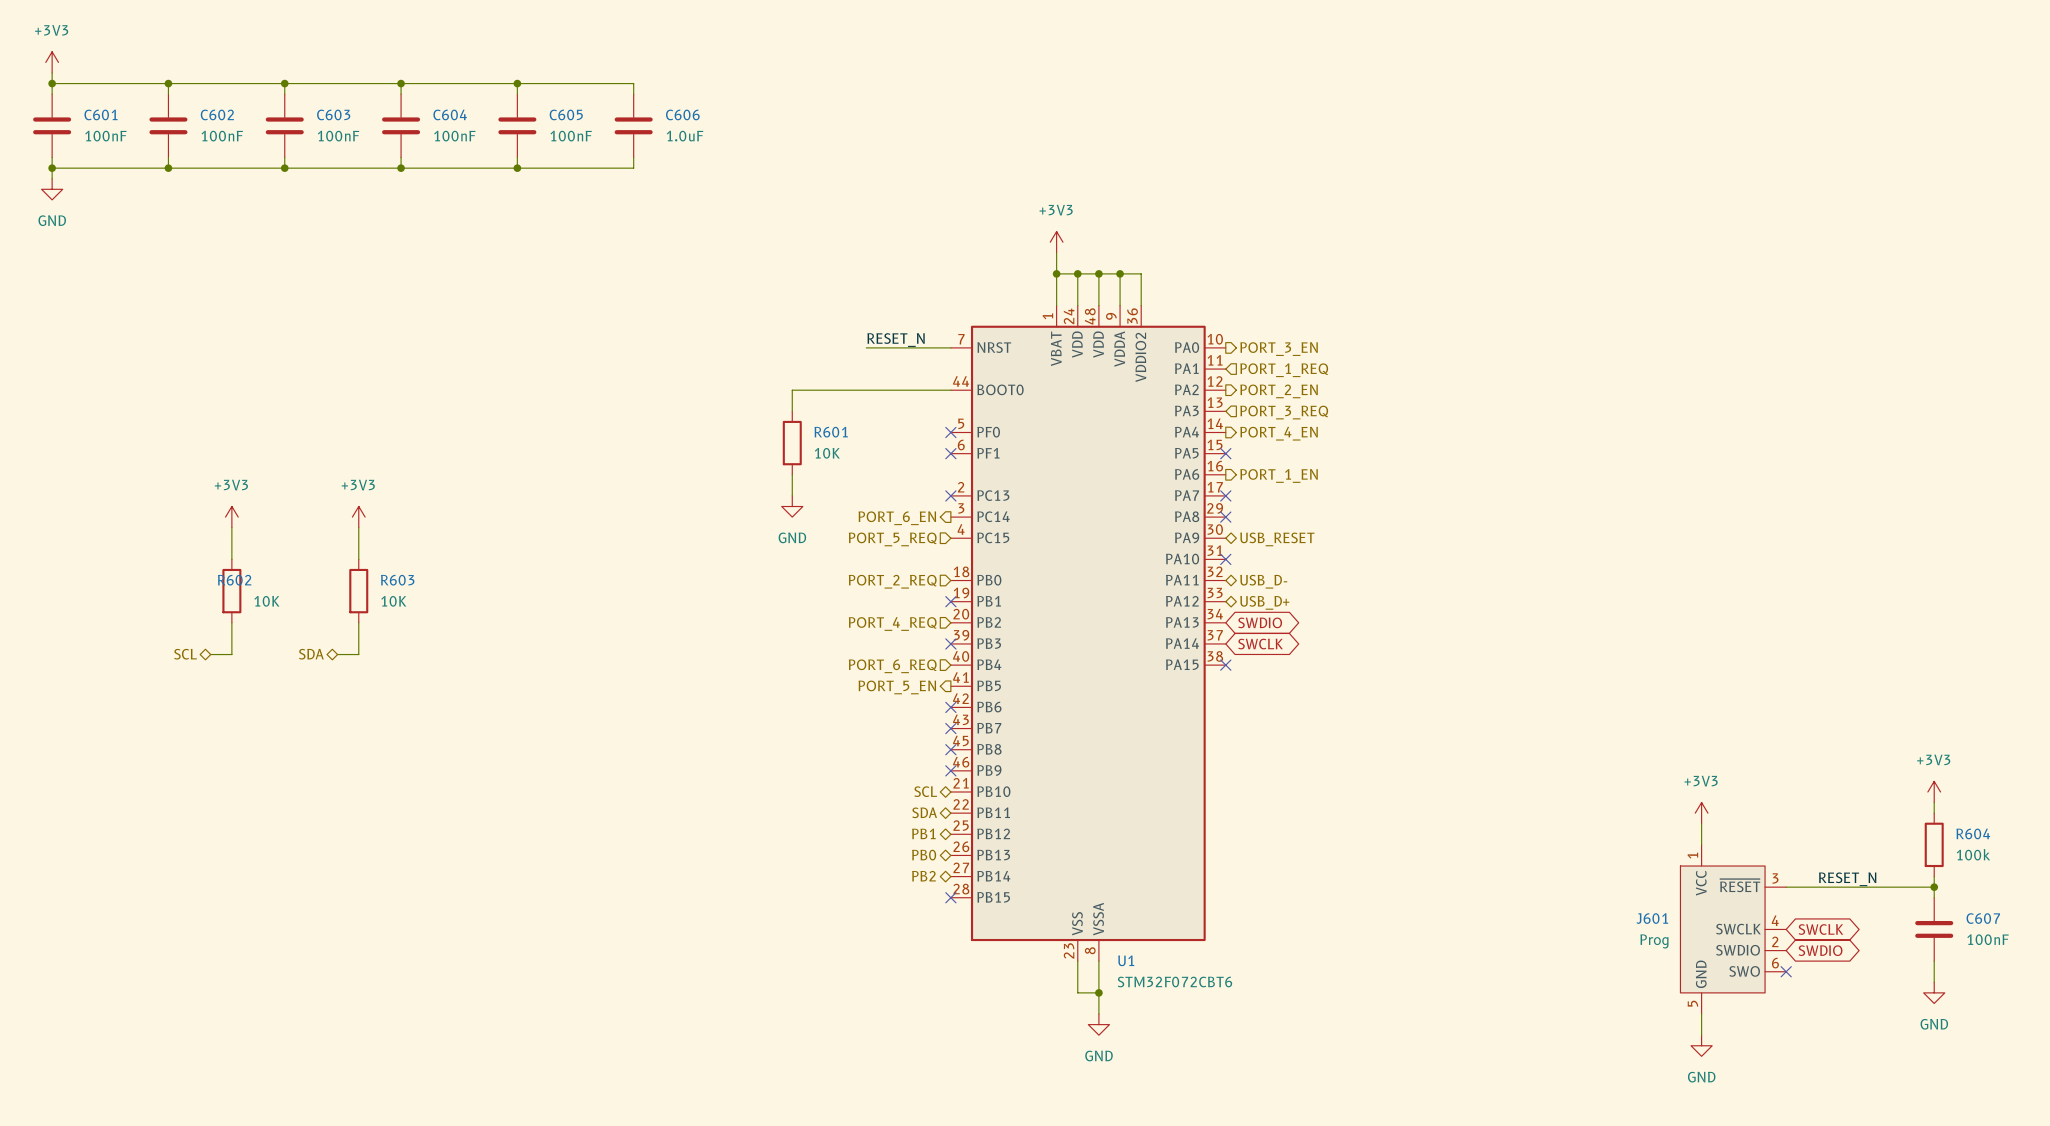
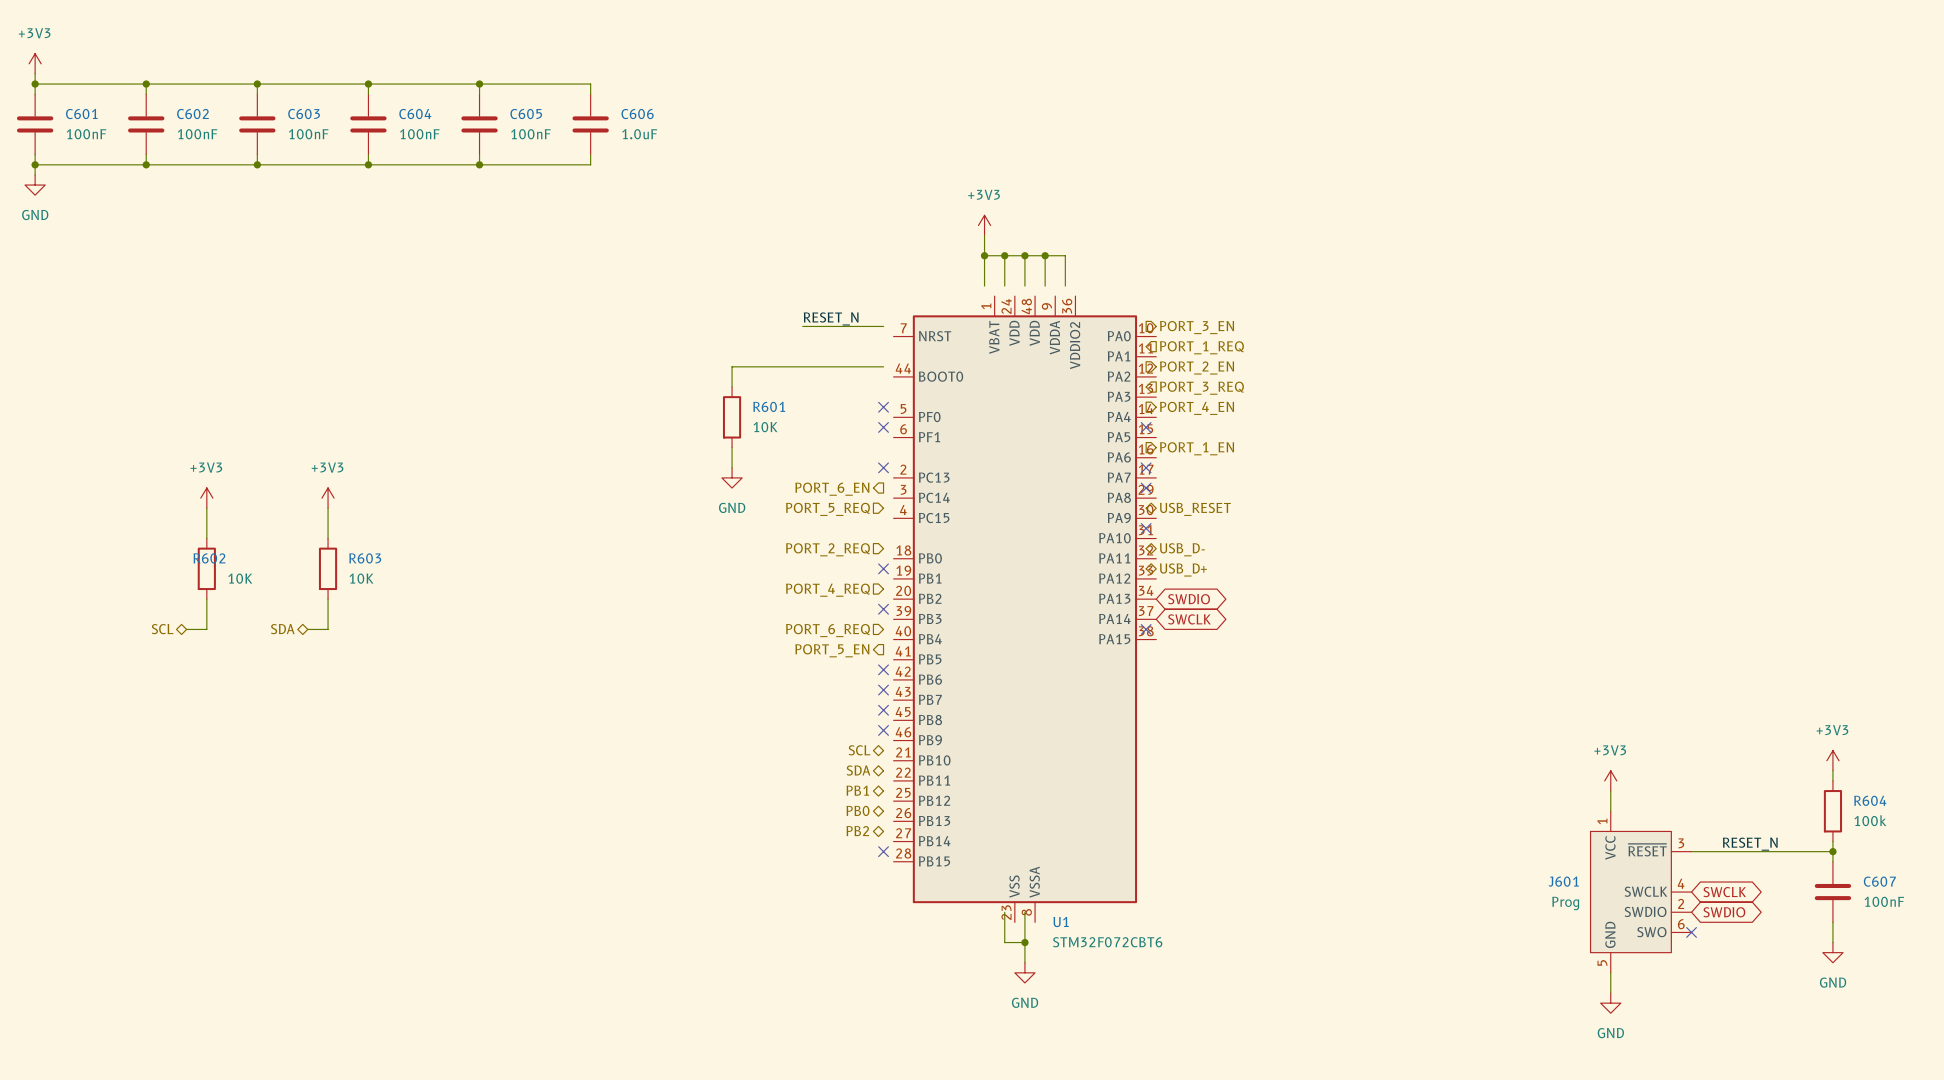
power symbol position: +3V3 (1056, 242) -> +3V3 (984, 225)
wire: (1056, 252) (1056, 305) -> (984, 235) (984, 286)
junction: none -> (984, 255)
junction: none -> (1004, 255)
junction: none -> (1024, 255)
junction: none -> (1045, 255)
wire: (1056, 273) (1141, 273) (1141, 305) -> (984, 255) (1065, 255) (1065, 286)
junction: (1056, 273) -> none
wire: (1077, 273) (1077, 305) -> (1004, 255) (1004, 286)
junction: (1077, 273) -> none
wire: (1098, 273) (1098, 305) -> (1024, 255) (1024, 286)
junction: (1098, 273) -> none
wire: (1120, 273) (1120, 305) -> (1045, 255) (1045, 286)
junction: (1120, 273) -> none
label position: RESET_N (896, 340) -> RESET_N (831, 318)
wire: (866, 347) (950, 347) -> (802, 326) (883, 326)
hierarchical label position: PORT_3_EN (1279, 349) -> PORT_3_EN (1197, 327)
hierarchical label position: PORT_1_REQ (1284, 370) -> PORT_1_REQ (1201, 347)
wire: (950, 390) (792, 390) (792, 411) -> (883, 366) (732, 366) (732, 387)
hierarchical label position: PORT_2_EN (1279, 391) -> PORT_2_EN (1197, 367)
hierarchical label position: PORT_3_REQ (1284, 412) -> PORT_3_REQ (1201, 388)
no-connect mark: none -> (883, 407)
no-connect mark: (950, 432) -> none
hierarchical label position: PORT_4_EN (1279, 433) -> PORT_4_EN (1197, 408)
R601 position: (792, 443) -> (732, 417)
no-connect mark: none -> (883, 427)
no-connect mark: (950, 453) -> none
no-connect mark position: (1225, 453) -> (1146, 427)
wire: (792, 474) (792, 495) -> (732, 447) (732, 467)
hierarchical label position: PORT_1_EN (1279, 475) -> PORT_1_EN (1197, 448)
no-connect mark: none -> (1146, 467)
no-connect mark position: (950, 495) -> (883, 467)
no-connect mark: (1225, 495) -> none
power symbol position: GND (792, 506) -> GND (732, 477)
no-connect mark: none -> (1146, 488)
no-connect mark: (1225, 517) -> none
hierarchical label position: PORT_6_EN (897, 518) -> PORT_6_EN (832, 489)
hierarchical label position: PORT_5_REQ (892, 539) -> PORT_5_REQ (827, 509)
hierarchical label position: USB_RESET (1277, 539) -> USB_RESET (1195, 509)
no-connect mark position: (1225, 559) -> (1146, 528)
hierarchical label position: PORT_2_REQ (892, 581) -> PORT_2_REQ (827, 549)
hierarchical label position: USB_D- (1263, 581) -> USB_D- (1182, 549)
no-connect mark position: (950, 601) -> (883, 568)
hierarchical label position: USB_D+ (1264, 602) -> USB_D+ (1183, 569)
hierarchical label position: PORT_4_REQ (892, 624) -> PORT_4_REQ (827, 590)
no-connect mark position: (950, 643) -> (883, 609)
no-connect mark position: (1225, 665) -> (1146, 629)
hierarchical label position: PORT_6_REQ (892, 666) -> PORT_6_REQ (827, 630)
hierarchical label position: PORT_5_EN (897, 687) -> PORT_5_EN (832, 650)
no-connect mark: none -> (883, 669)
no-connect mark: (950, 707) -> none
no-connect mark: none -> (883, 690)
no-connect mark: (950, 728) -> none
no-connect mark: none -> (883, 710)
no-connect mark: (950, 749) -> none
no-connect mark: none -> (883, 730)
no-connect mark: (950, 770) -> none
hierarchical label position: SCL (925, 791) -> SCL (859, 750)
hierarchical label position: SDA (924, 812) -> SDA (858, 770)
hierarchical label position: PB1 (923, 833) -> PB1 (857, 790)
hierarchical label position: PB0 (924, 855) -> PB0 (857, 810)
hierarchical label position: PB2 (923, 876) -> PB2 (857, 831)
no-connect mark position: (950, 897) -> (883, 851)
wire: (1077, 961) (1077, 992) (1098, 992) -> (1004, 912) (1004, 942) (1024, 942)
wire: (1098, 961) (1098, 1014) -> (1024, 912) (1024, 962)
junction position: (1098, 992) -> (1024, 942)
power symbol position: GND (1098, 1024) -> GND (1024, 972)

